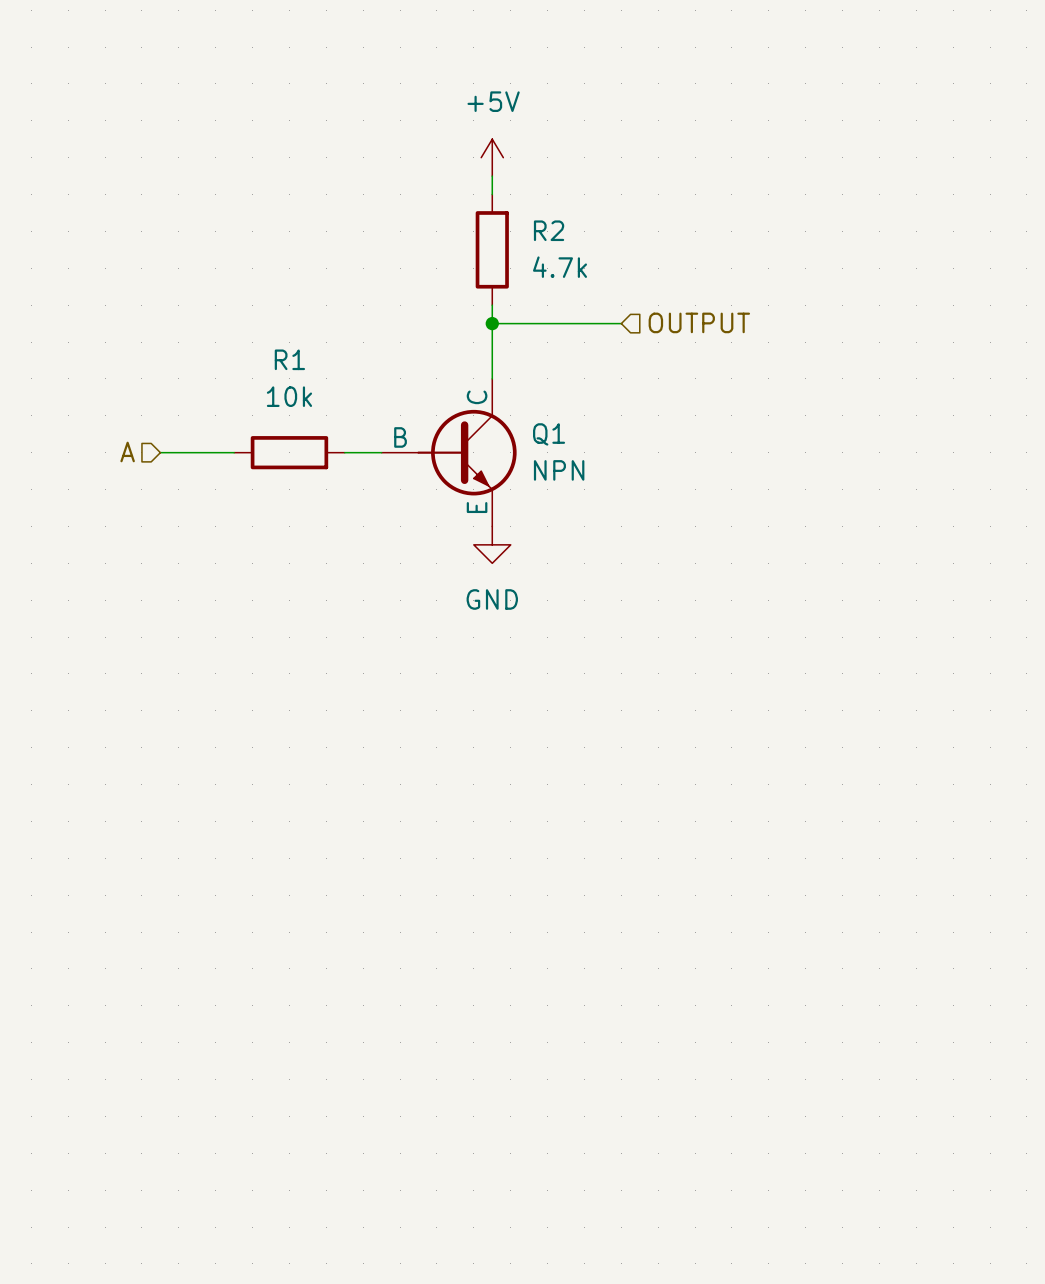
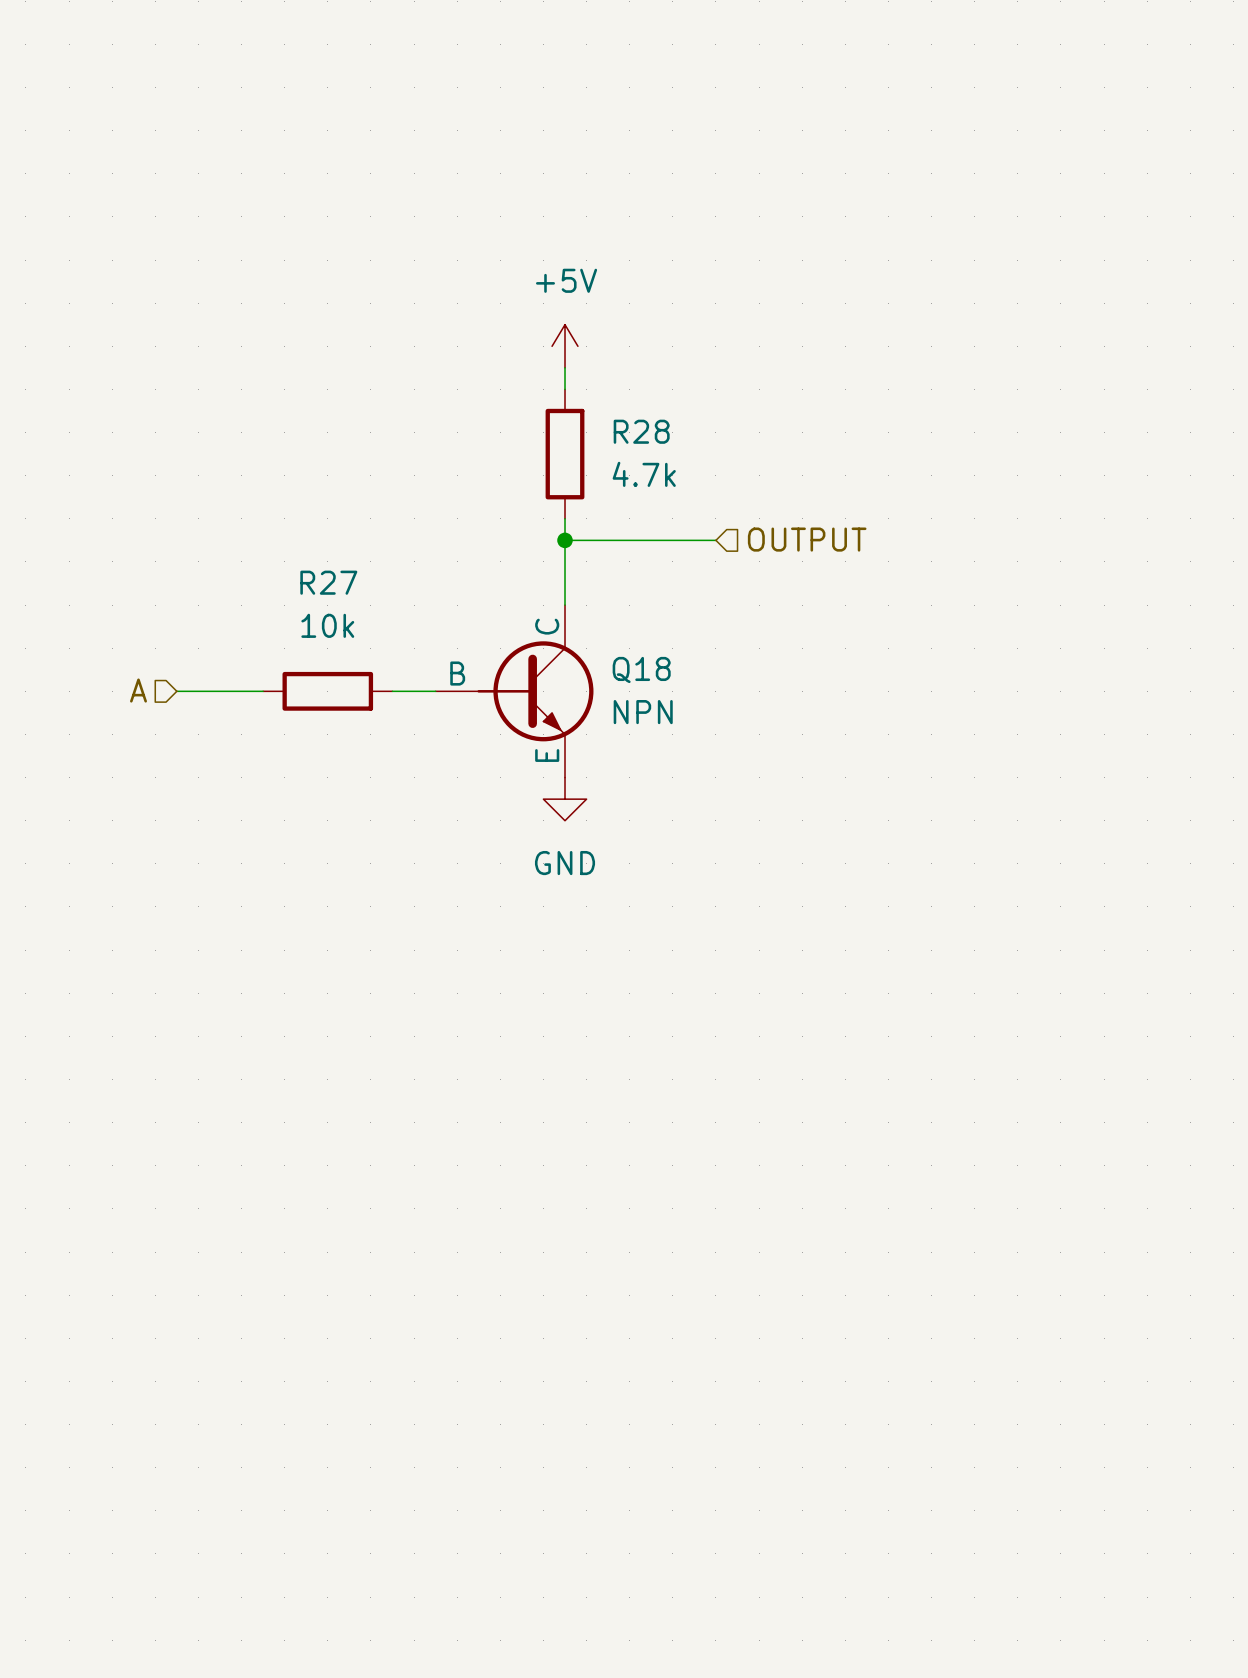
R2 name: R2 (549, 230) -> R28 (641, 431)
R1 name: R1 (289, 359) -> R27 (328, 582)
Q1 name: Q1 (549, 434) -> Q18 (641, 669)

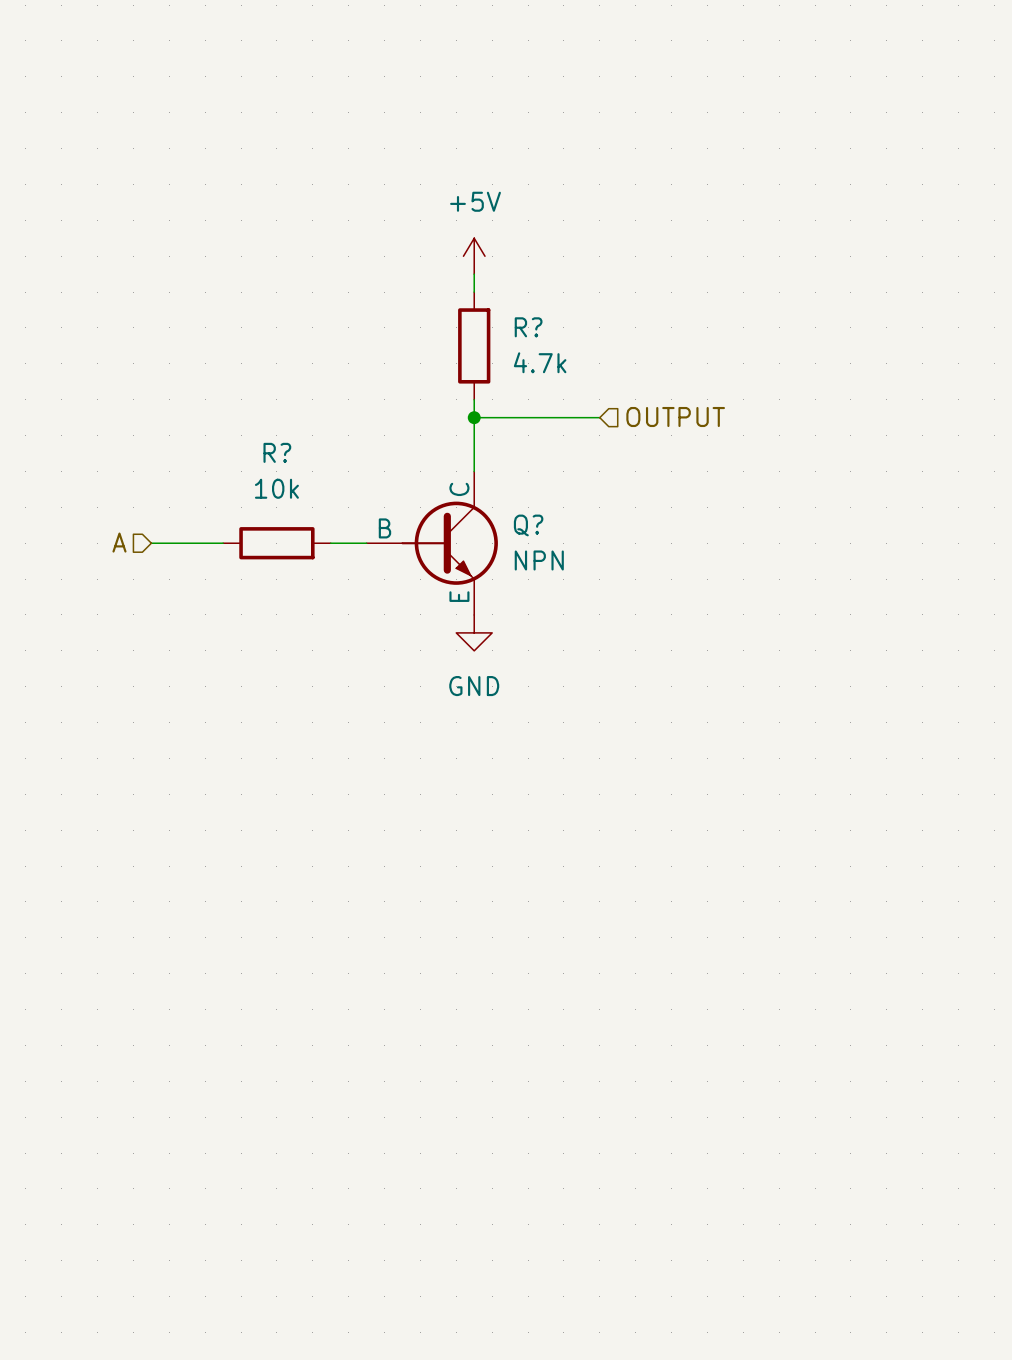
R28 name: R28 (641, 431) -> R? (528, 327)
R27 name: R27 (328, 582) -> R? (277, 452)
Q18 name: Q18 (641, 669) -> Q? (528, 525)

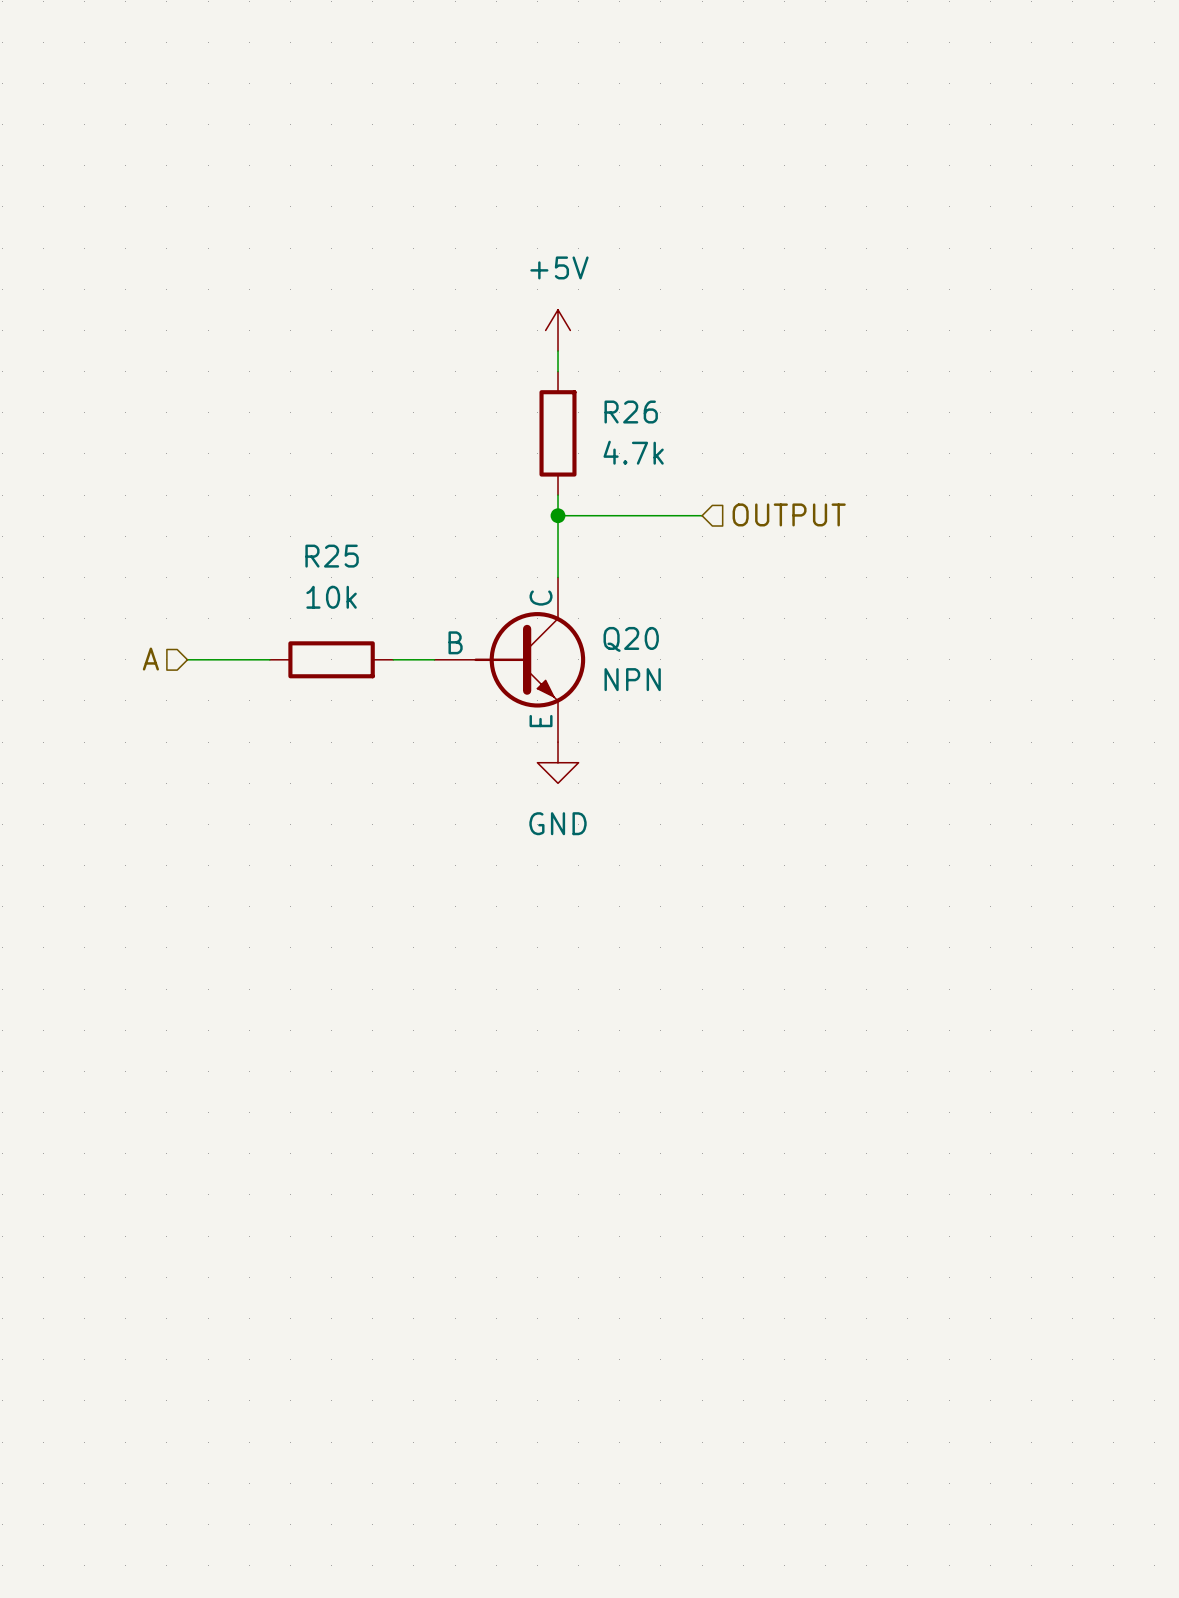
R? name: R? (528, 327) -> R26 (631, 412)
R? name: R? (277, 452) -> R25 (332, 556)
Q? name: Q? (528, 525) -> Q20 (631, 639)

